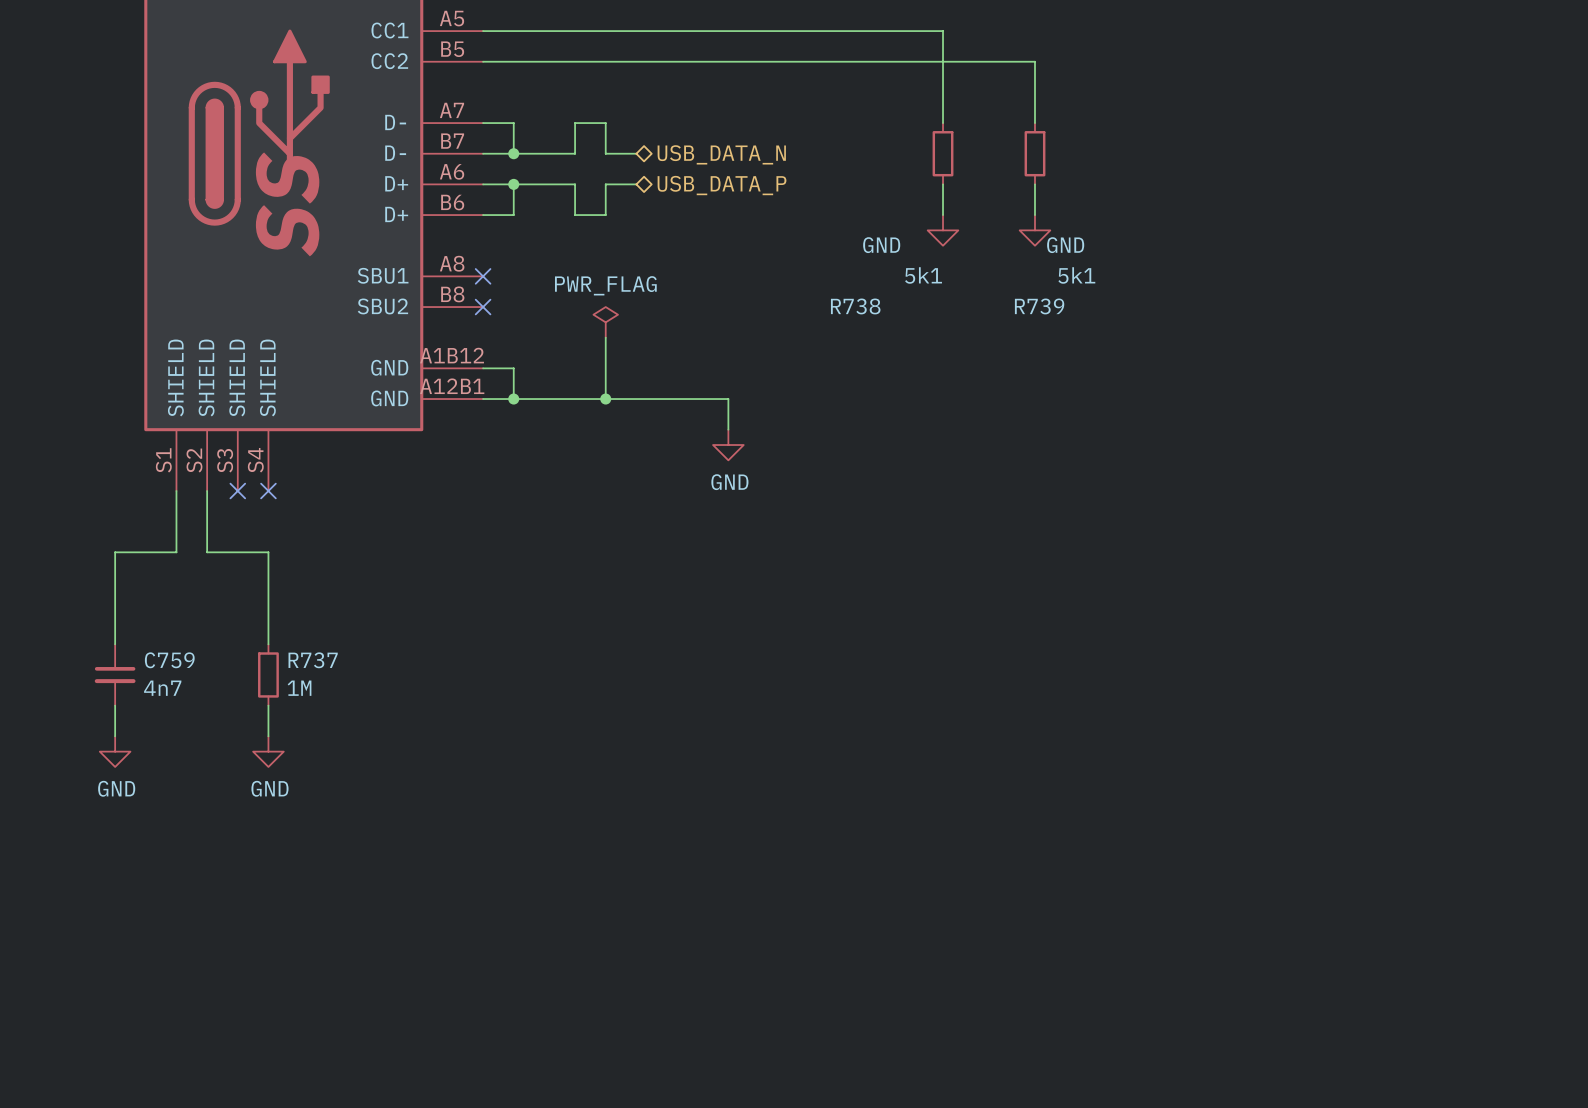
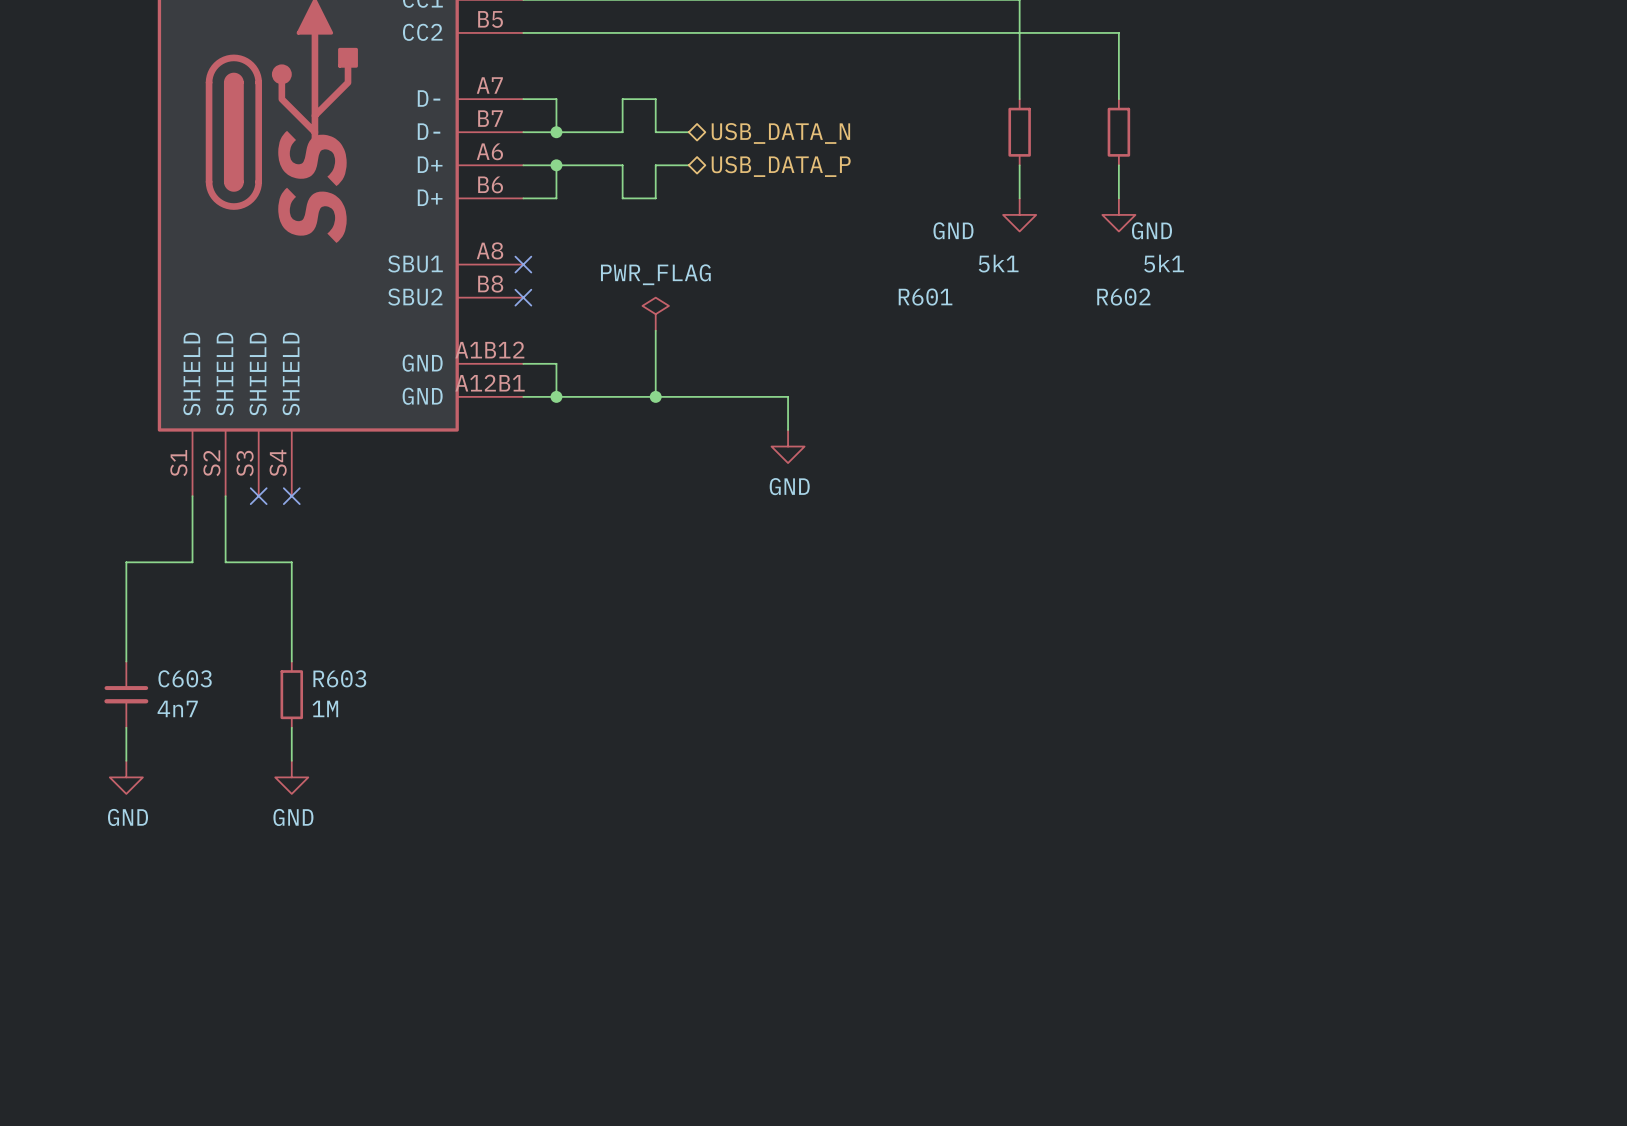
R738 name: R738 (855, 306) -> R601 (925, 297)
R739 name: R739 (1039, 306) -> R602 (1123, 297)
C759 name: C759 (169, 660) -> C603 (185, 678)
R737 name: R737 (313, 660) -> R603 (339, 678)

